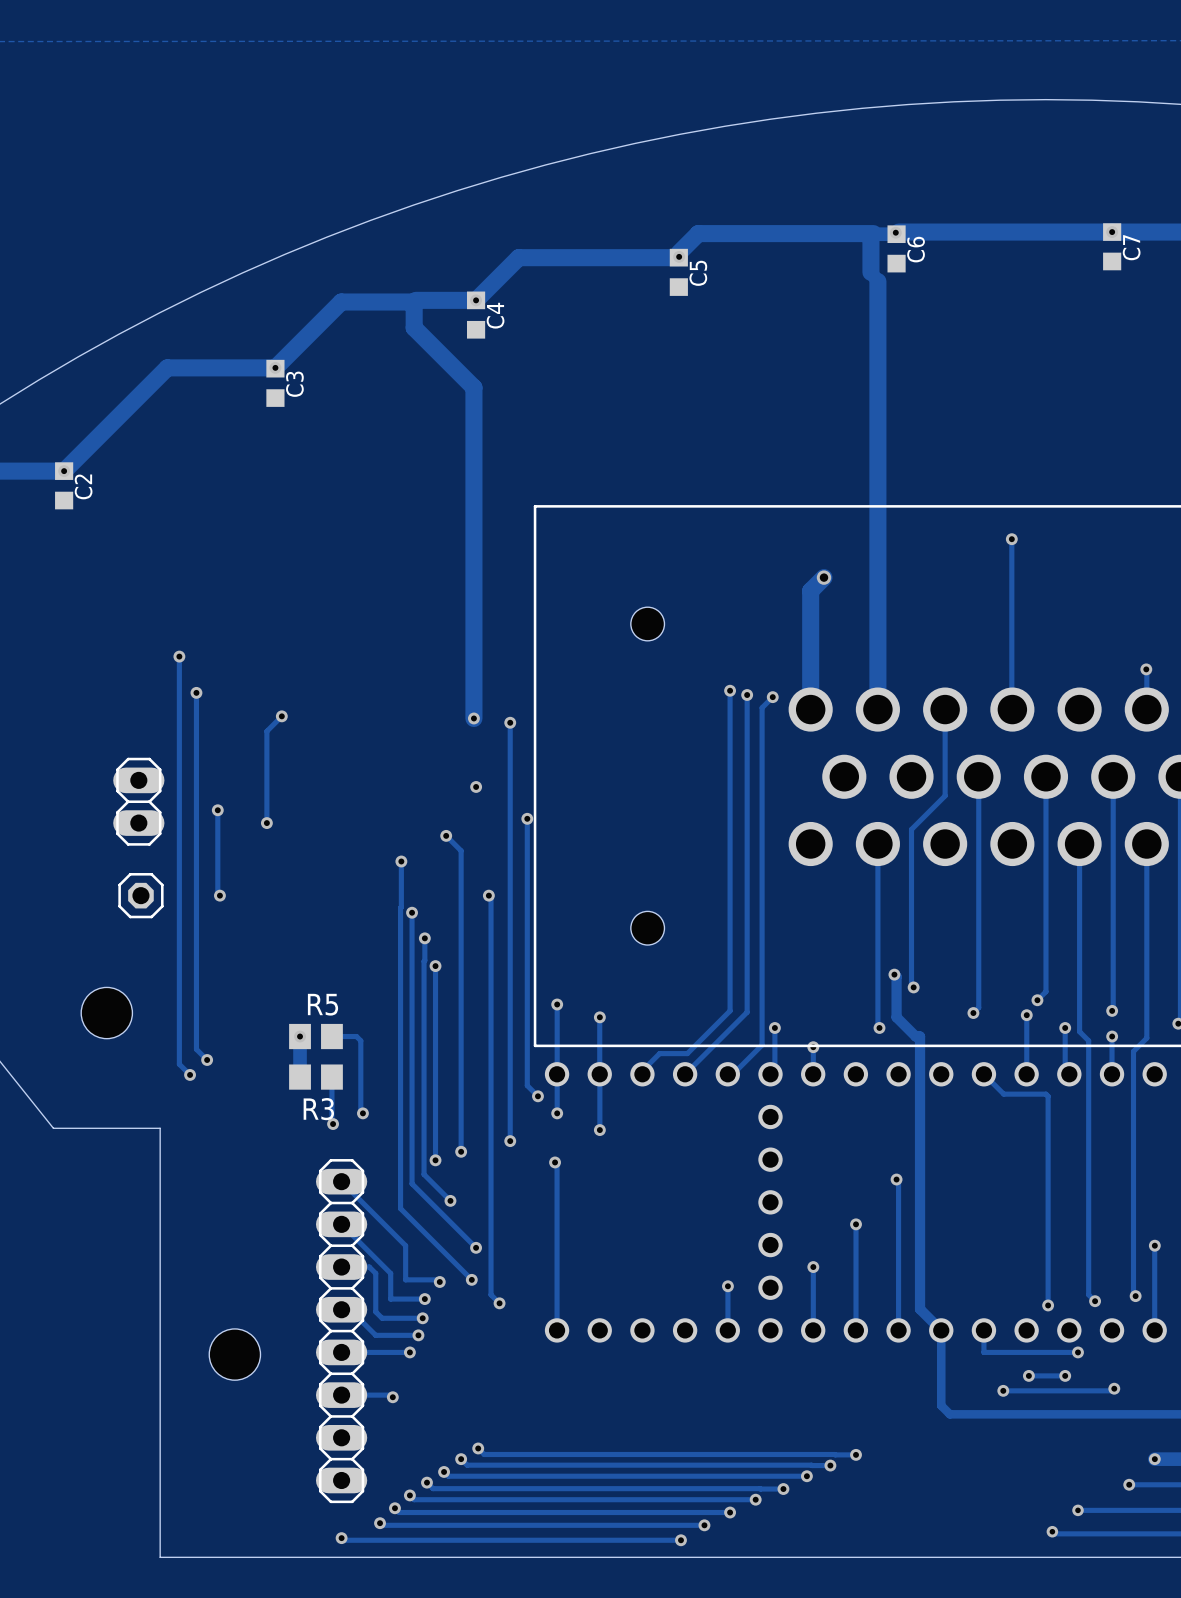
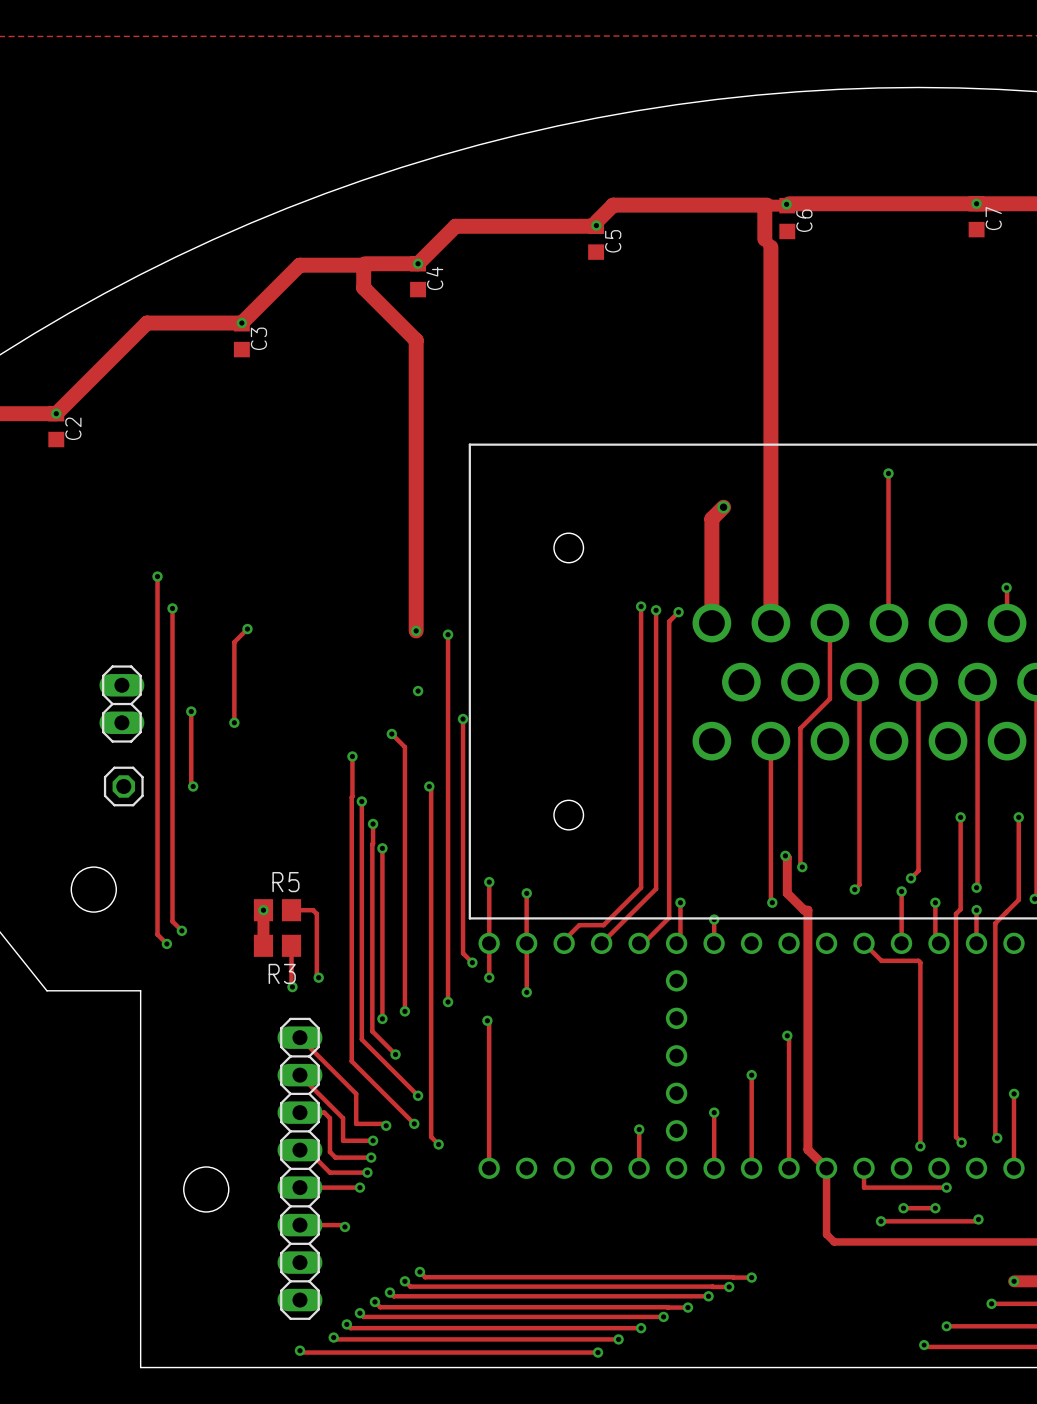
track: (1079, 844) (1079, 1031) (1088, 1040) -> (960, 817) (960, 909) (955, 913)
track: (1146, 844) (1146, 1038) -> (1018, 817) (1018, 899) (1007, 911)
via: none -> (960, 817)
via: none -> (1018, 817)

